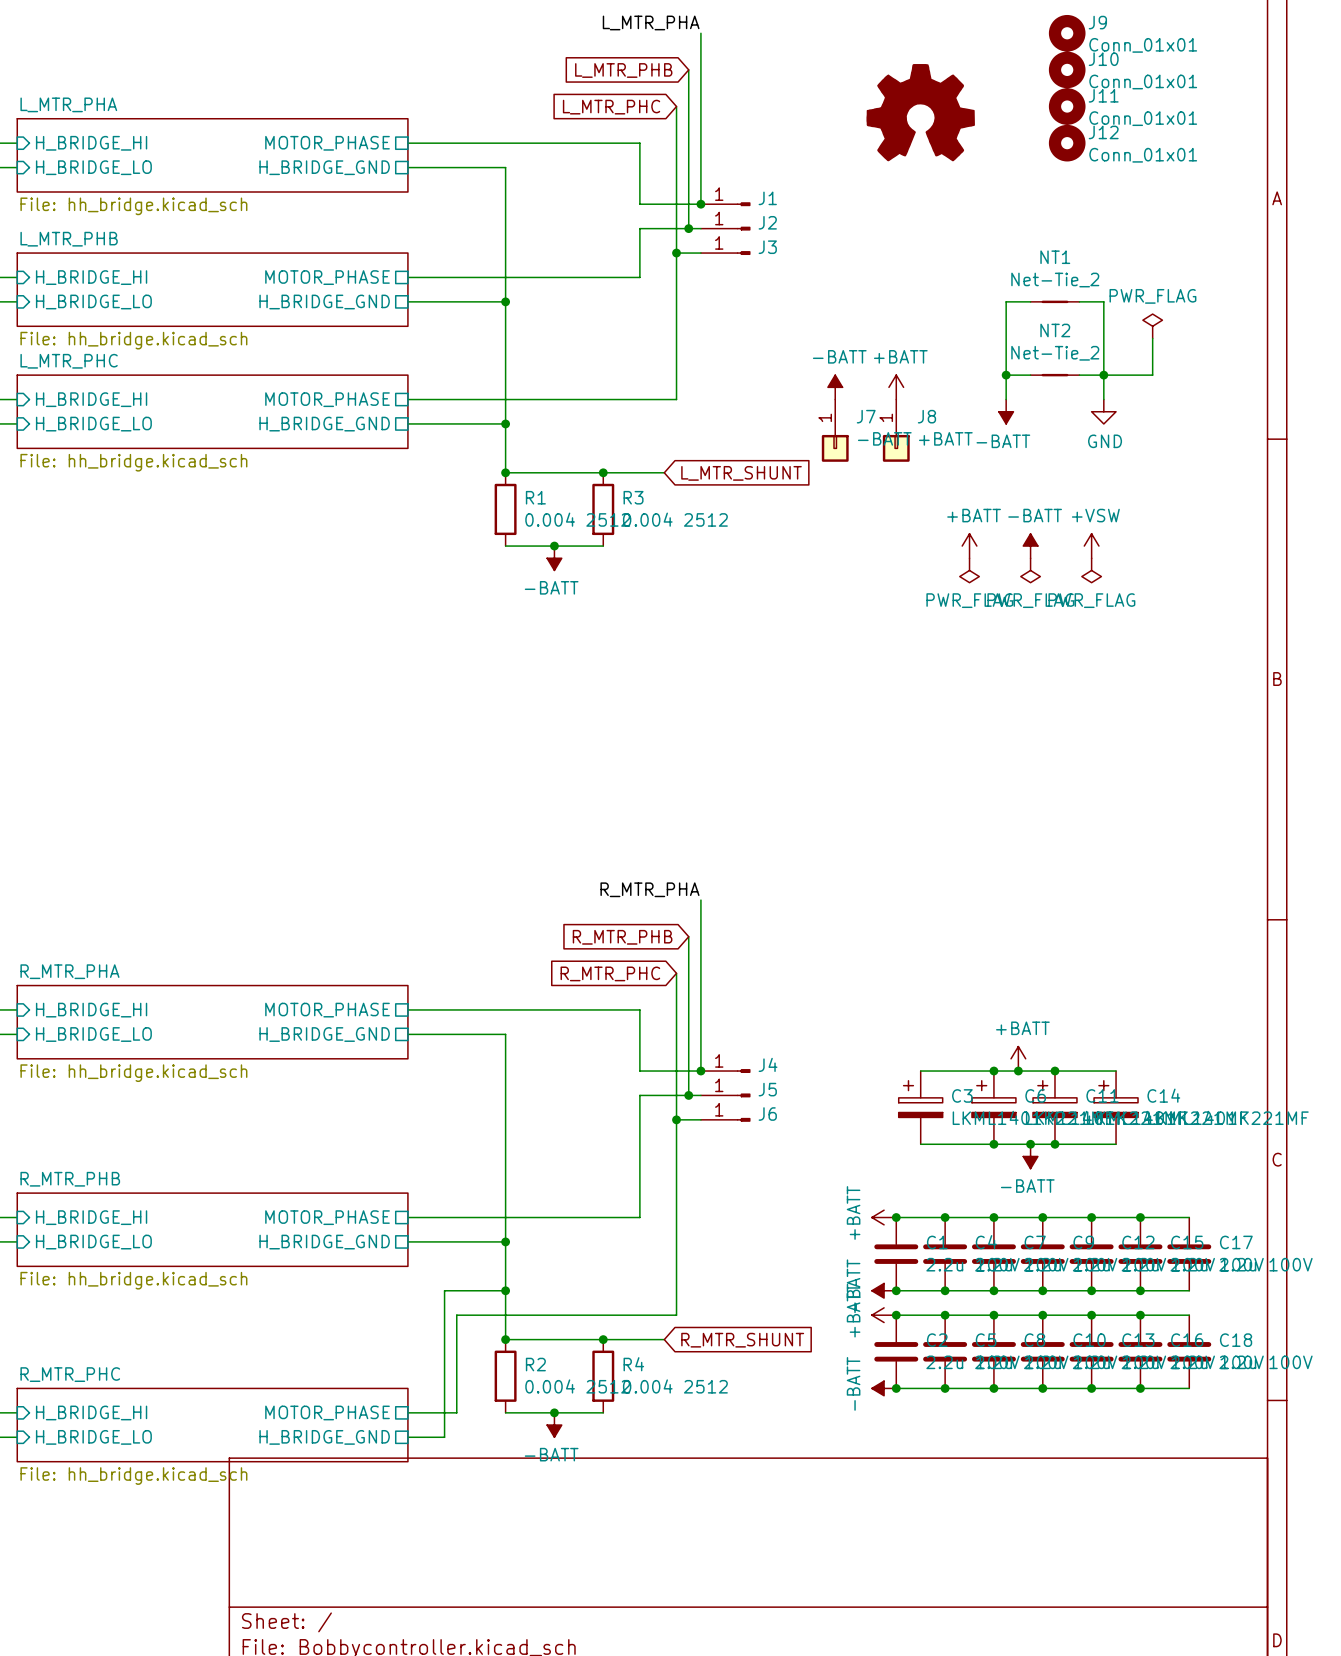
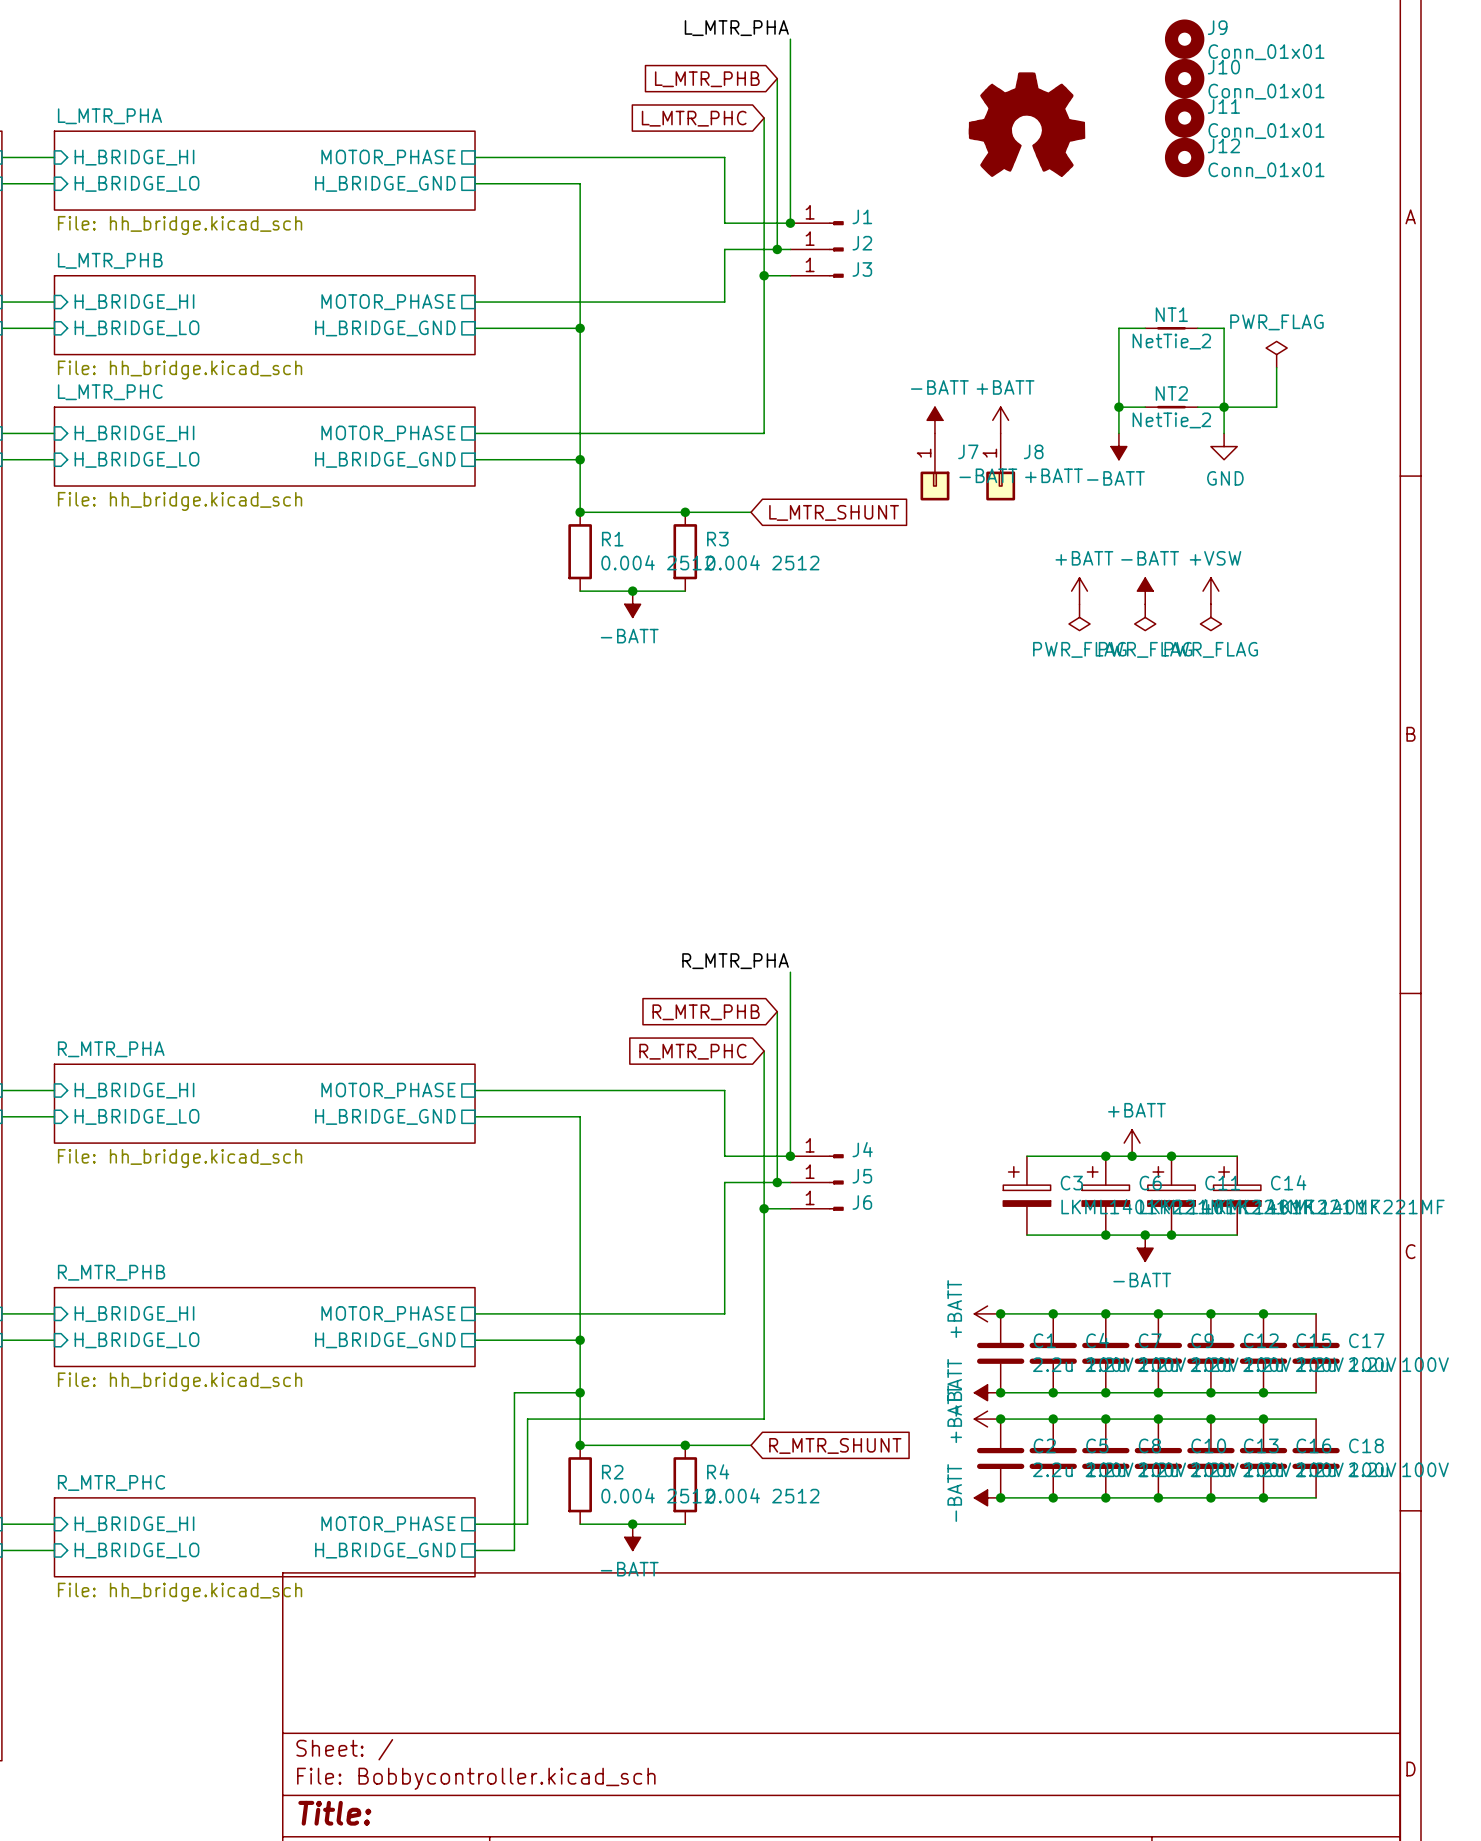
NT1 name position: NT1 (1055, 257) -> NT1 (1171, 314)
NT1 value: Net-Tie_2 (1055, 280) -> NetTie_2 (1171, 341)
NT2 name position: NT2 (1055, 330) -> NT2 (1171, 393)
NT2 value: Net-Tie_2 (1055, 353) -> NetTie_2 (1171, 420)

